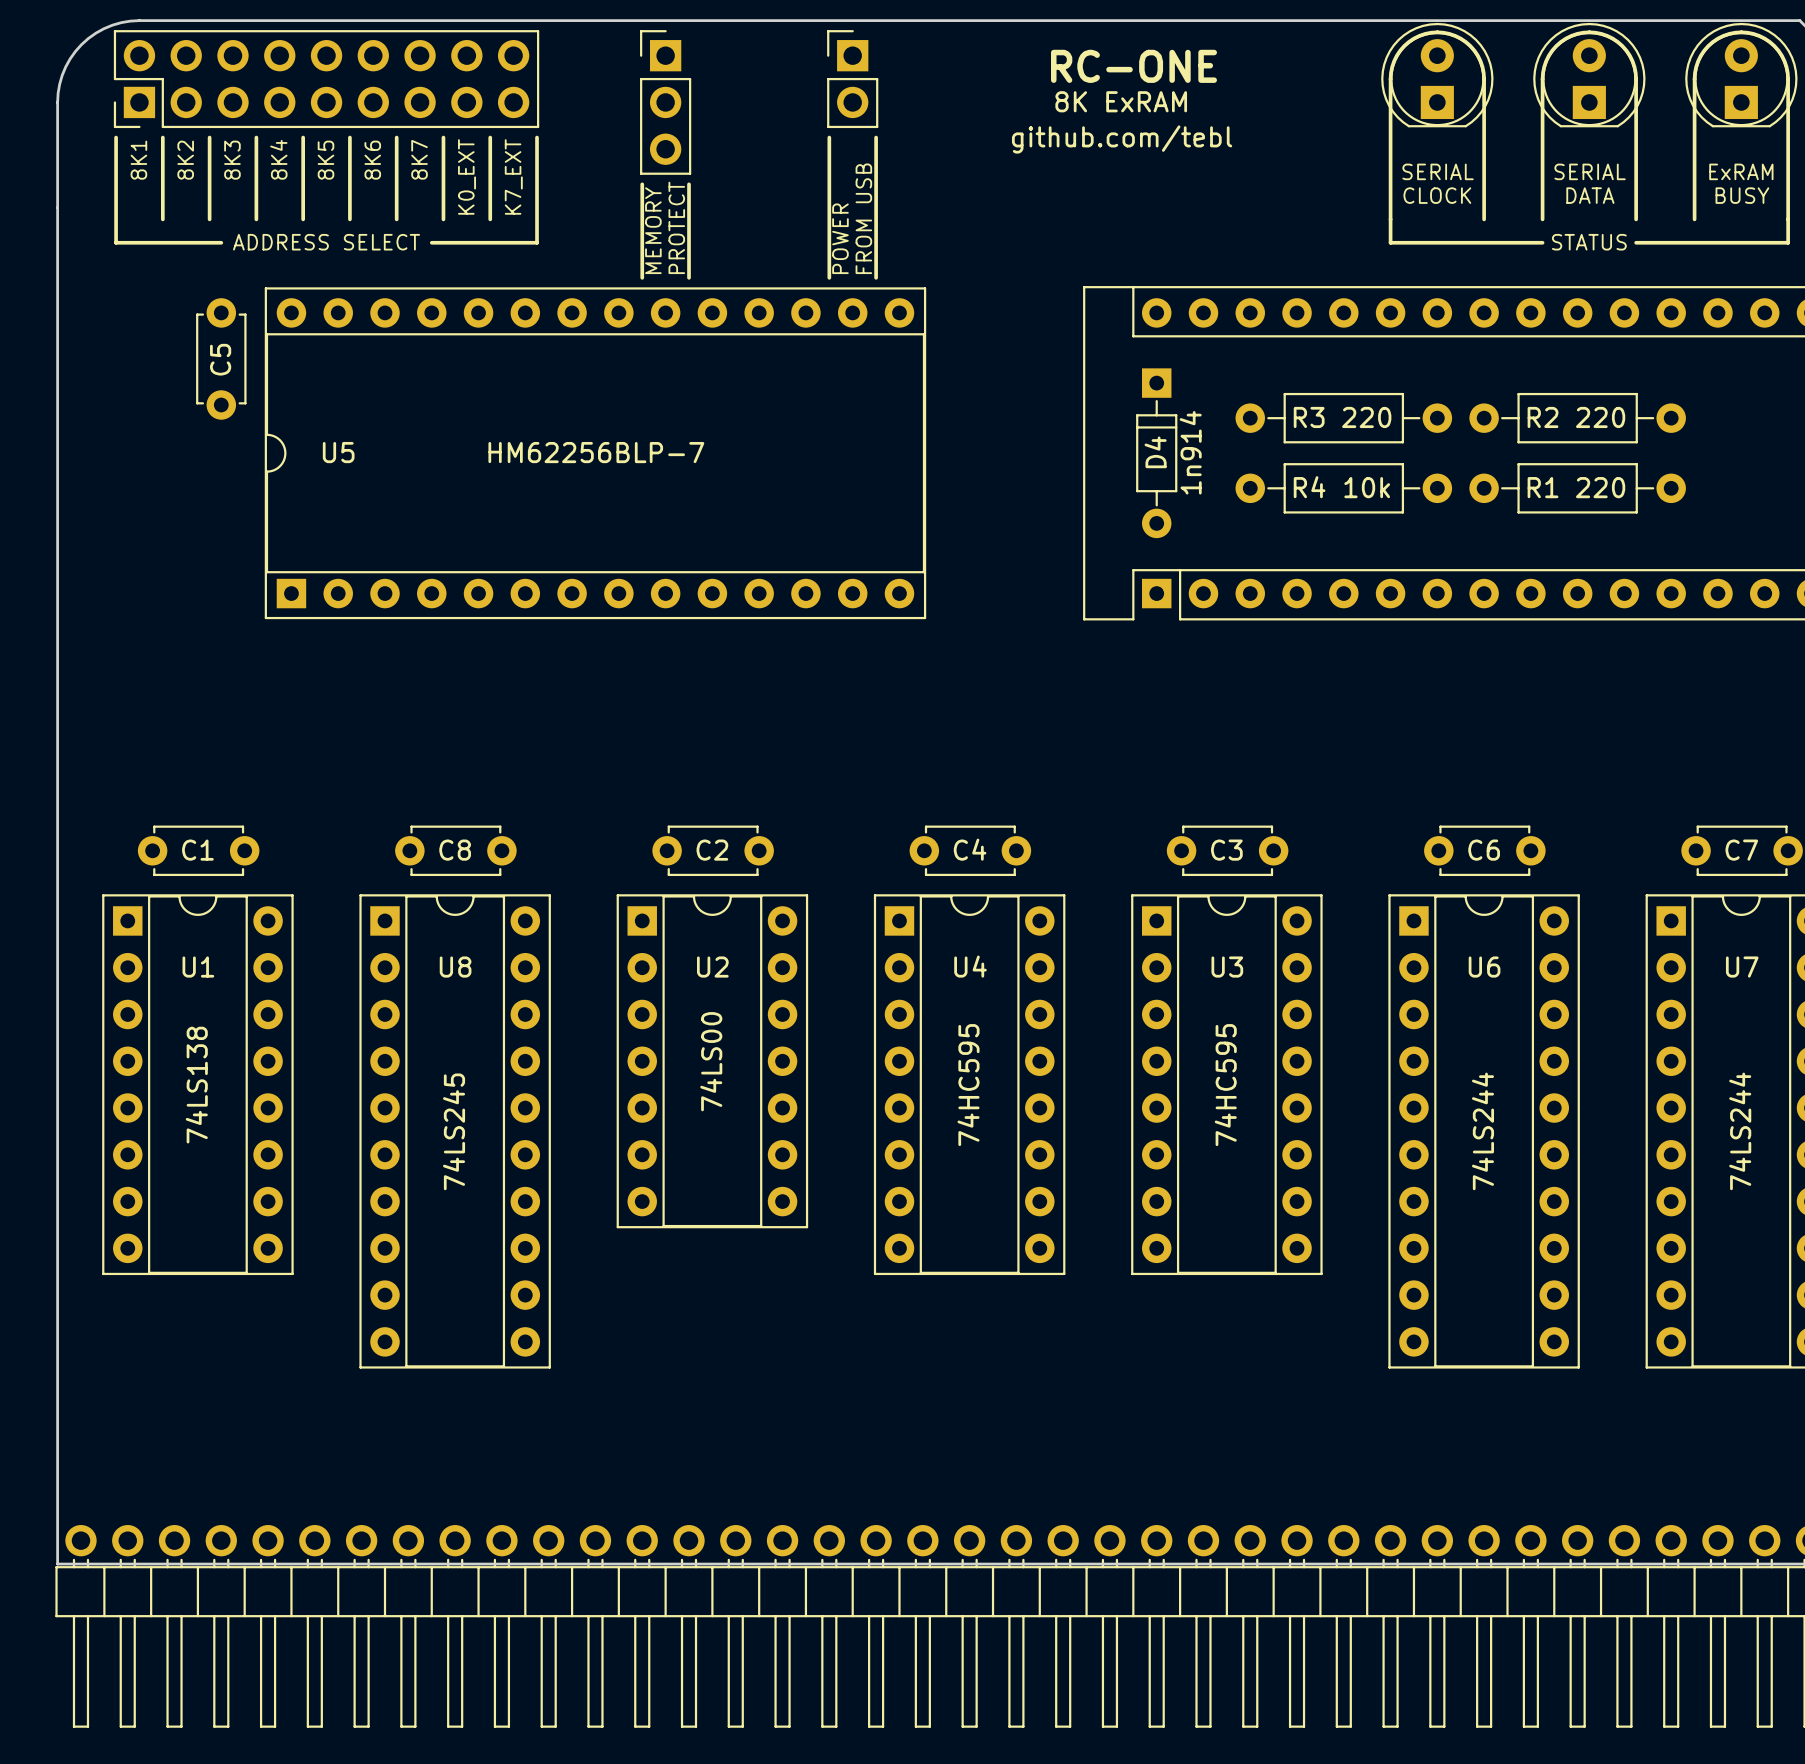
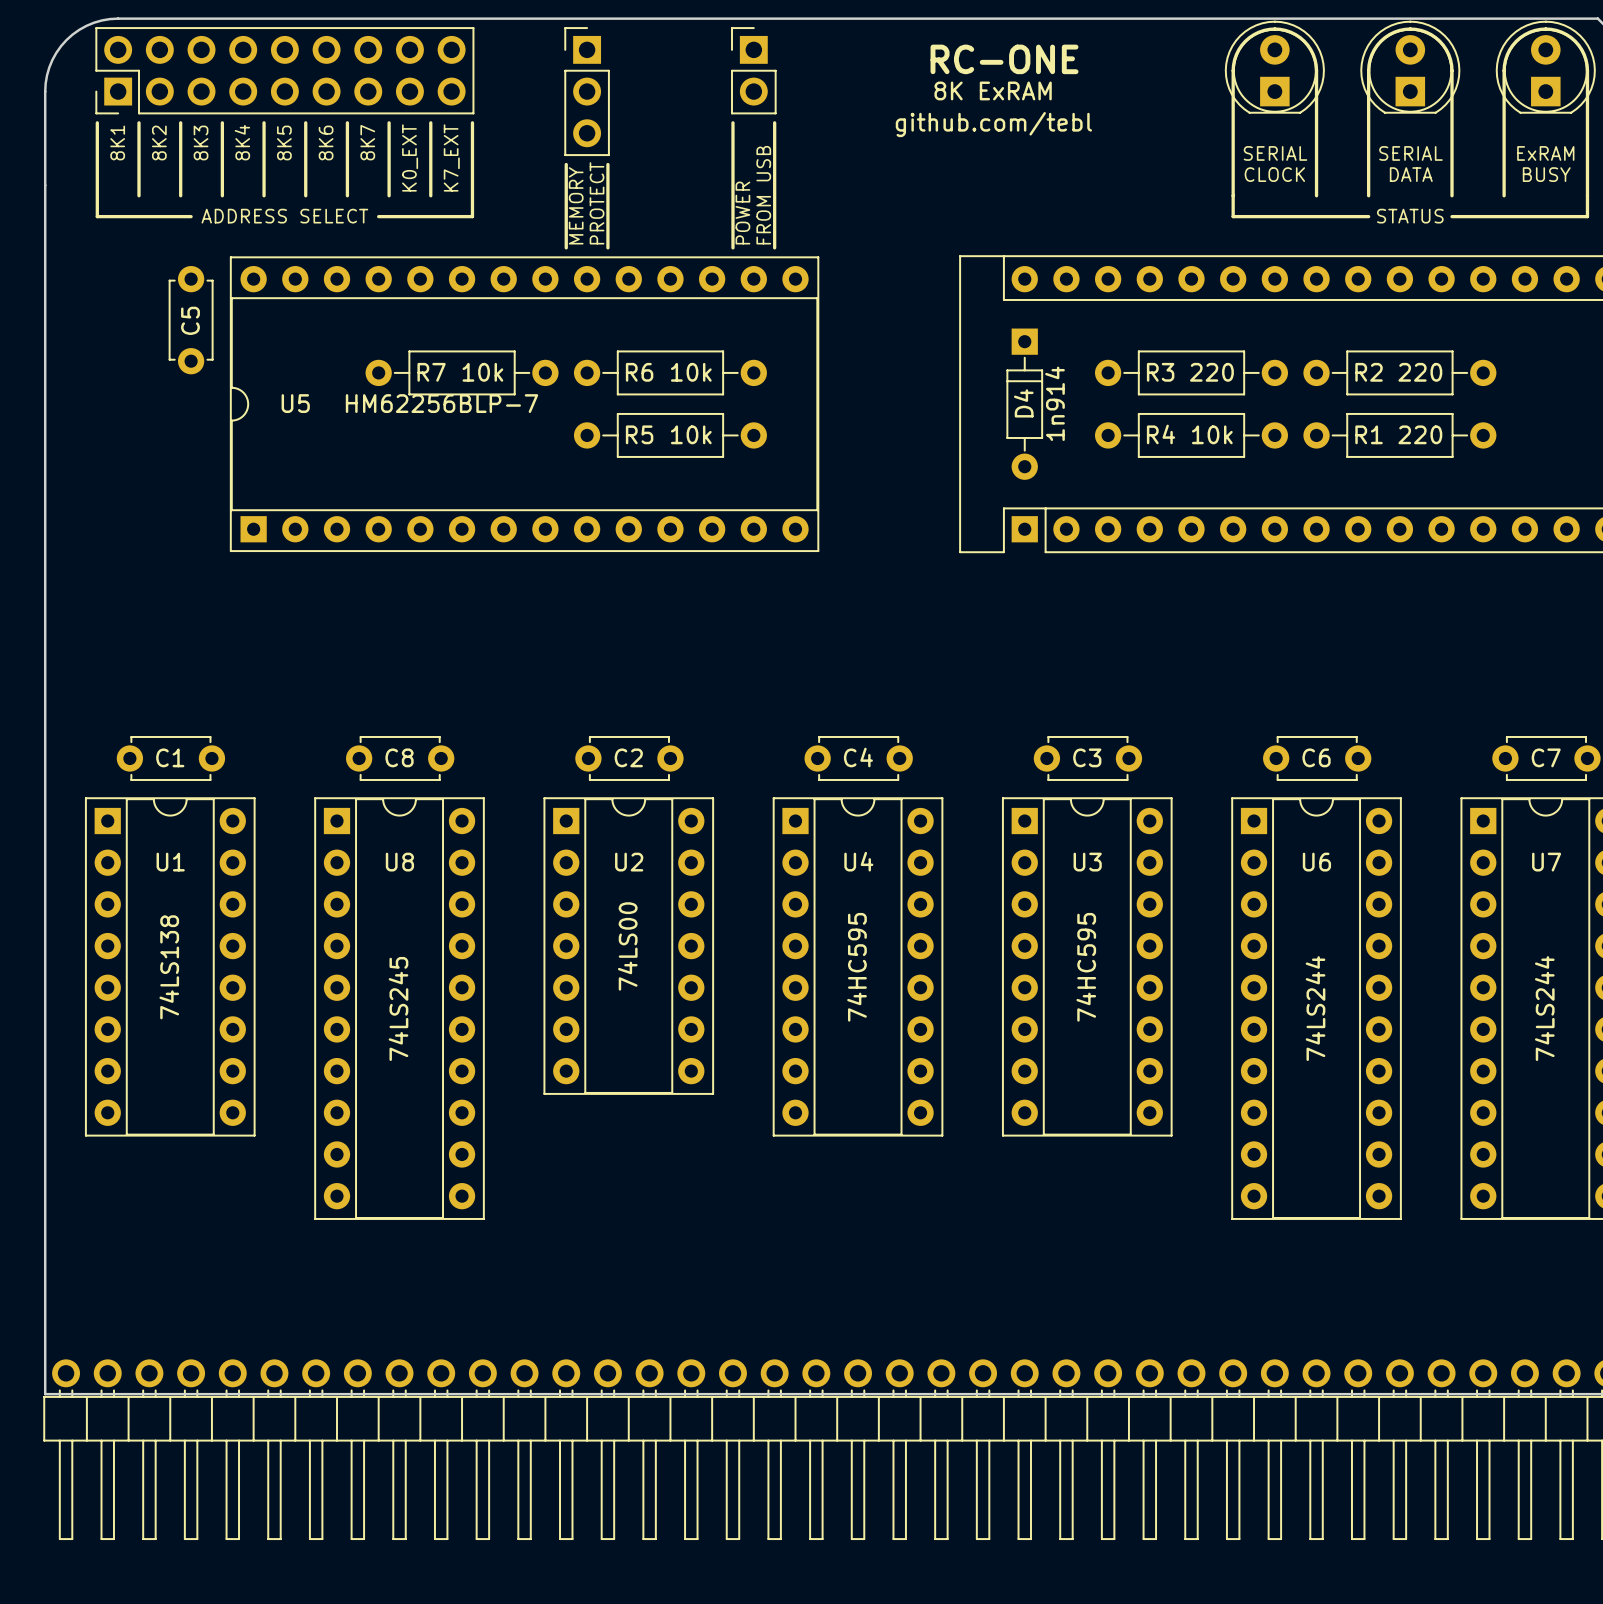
R7: none -> 10k (462, 372)
R6: none -> 10k (670, 372)
U5 value position: HM62256BLP-7 (596, 452) -> HM62256BLP-7 (441, 403)
R5: none -> 10k (670, 435)

